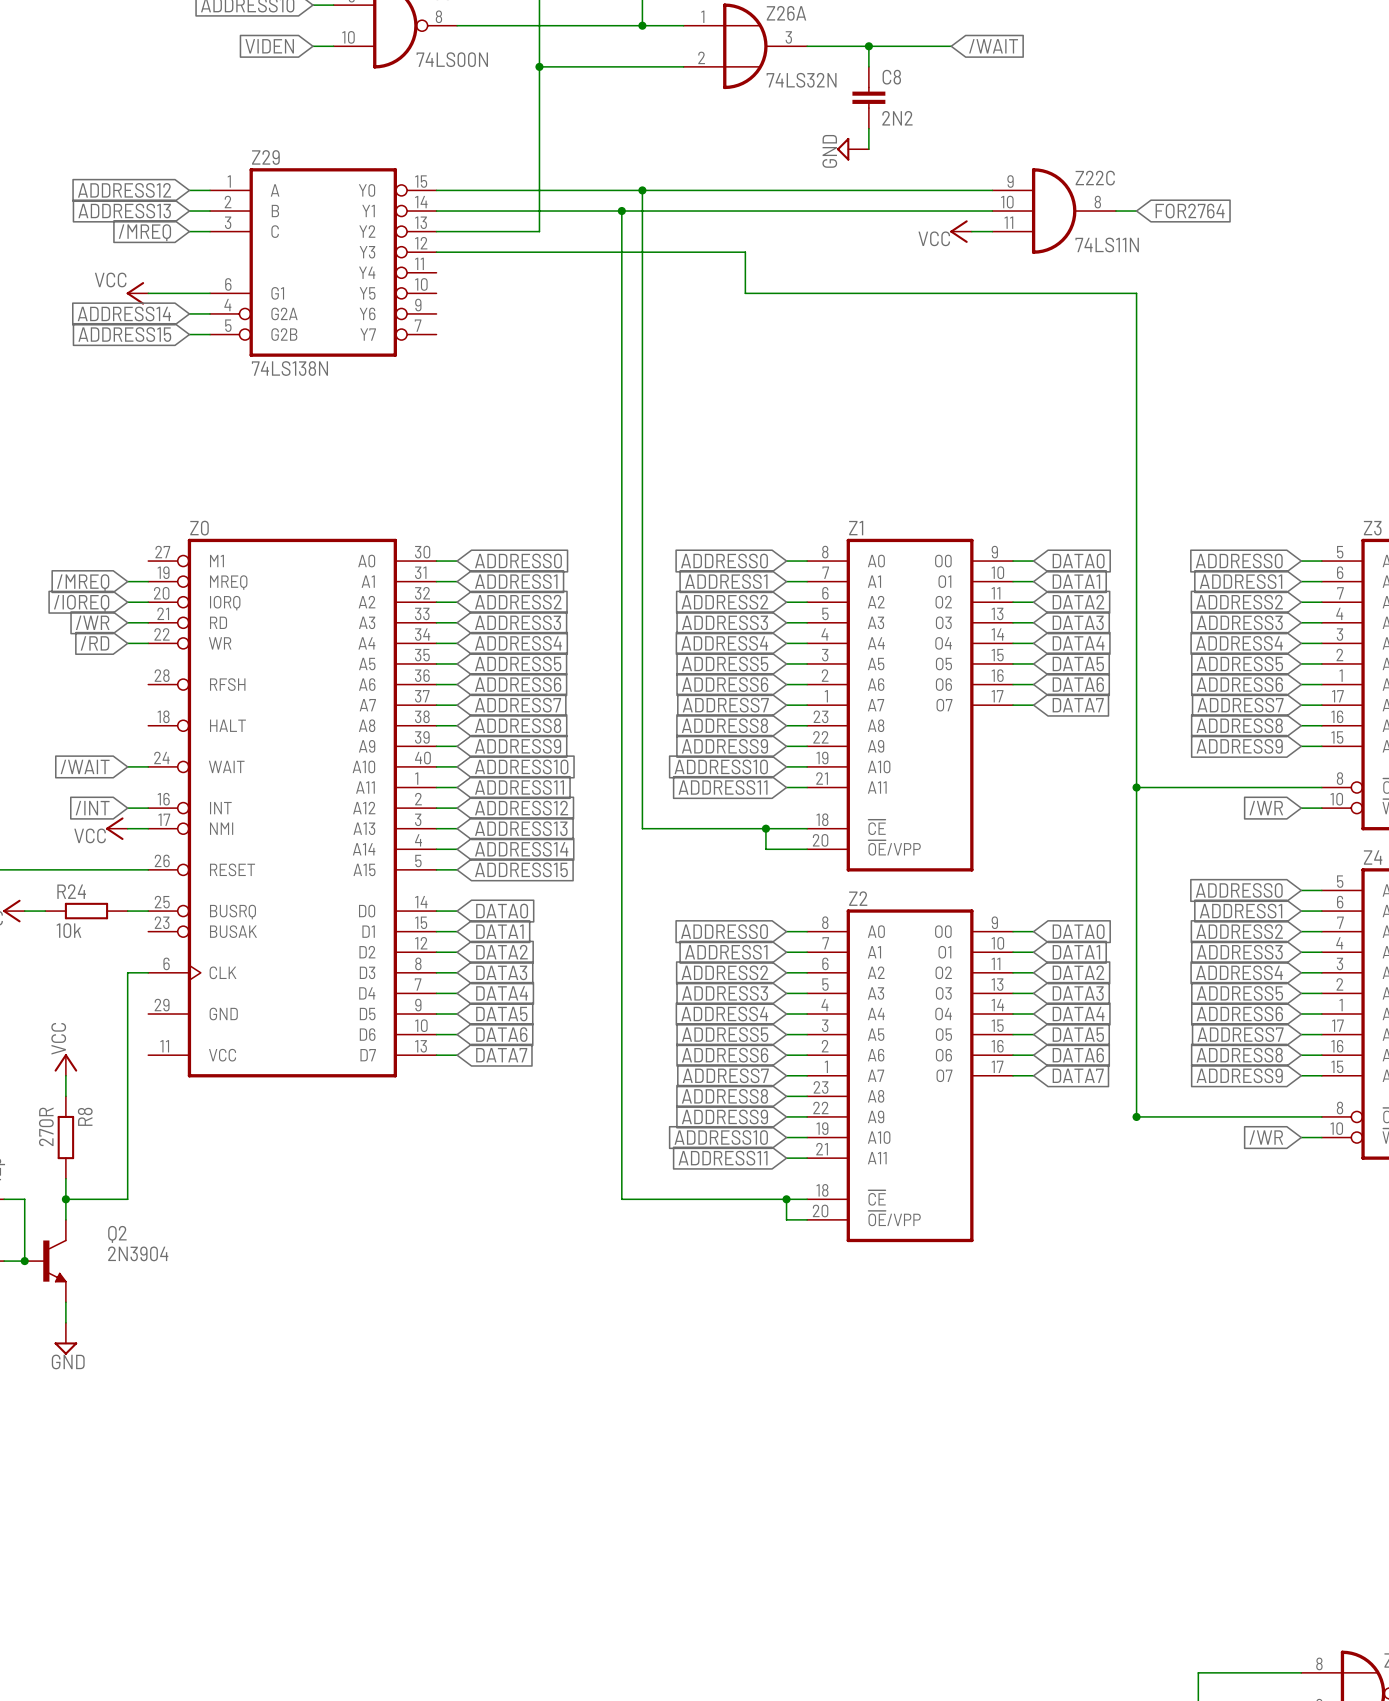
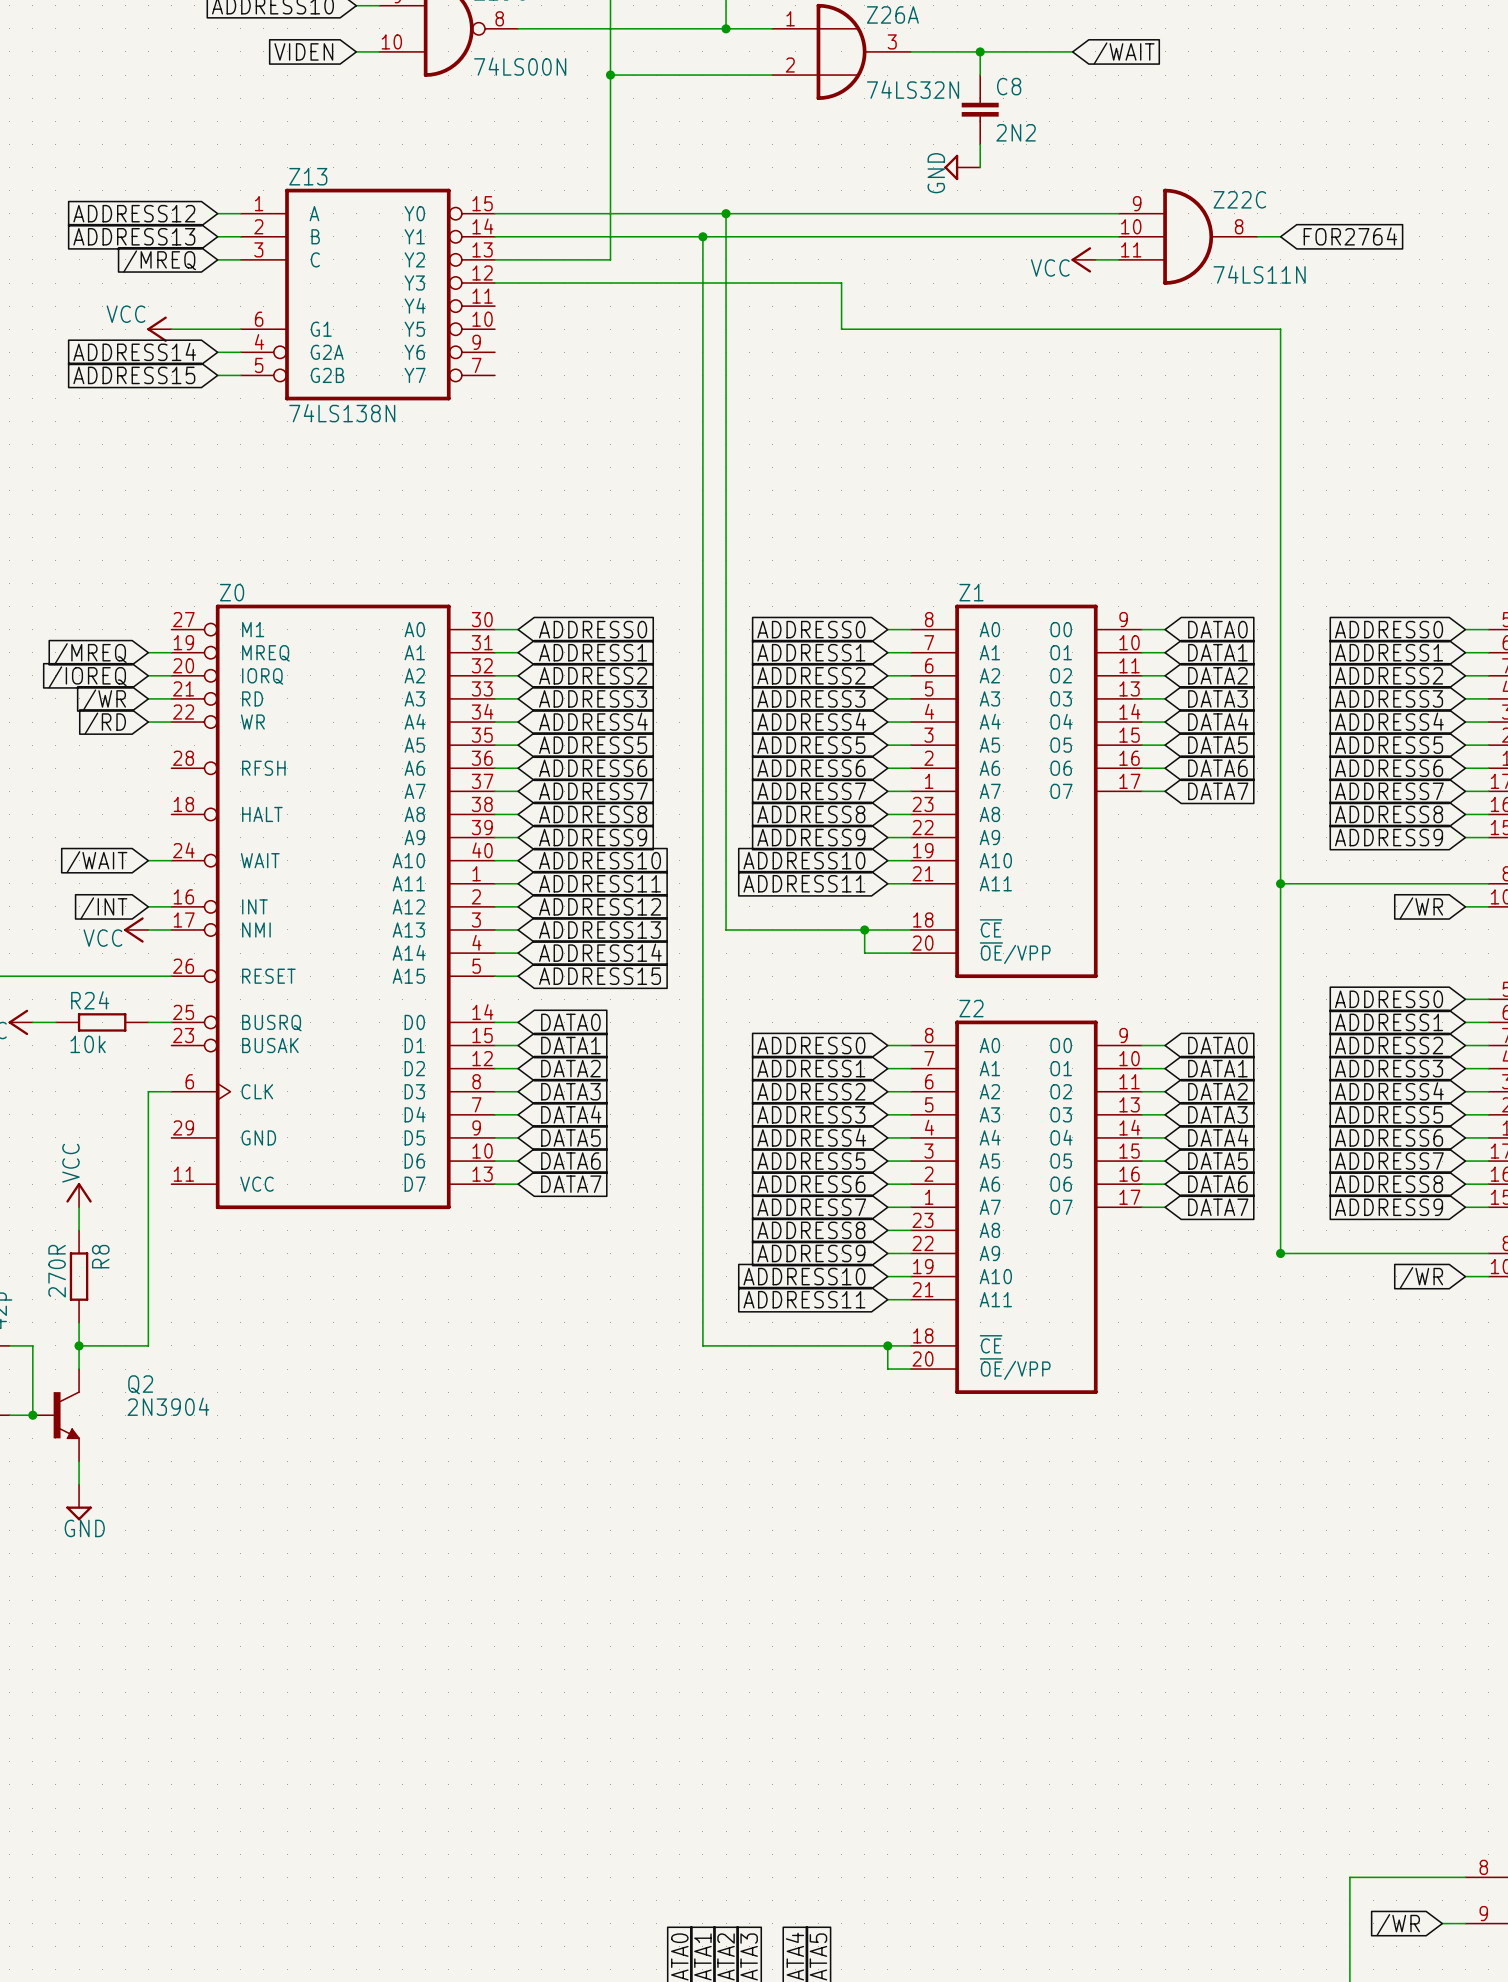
Z29 name: Z29 (265, 157) -> Z13 (308, 176)

